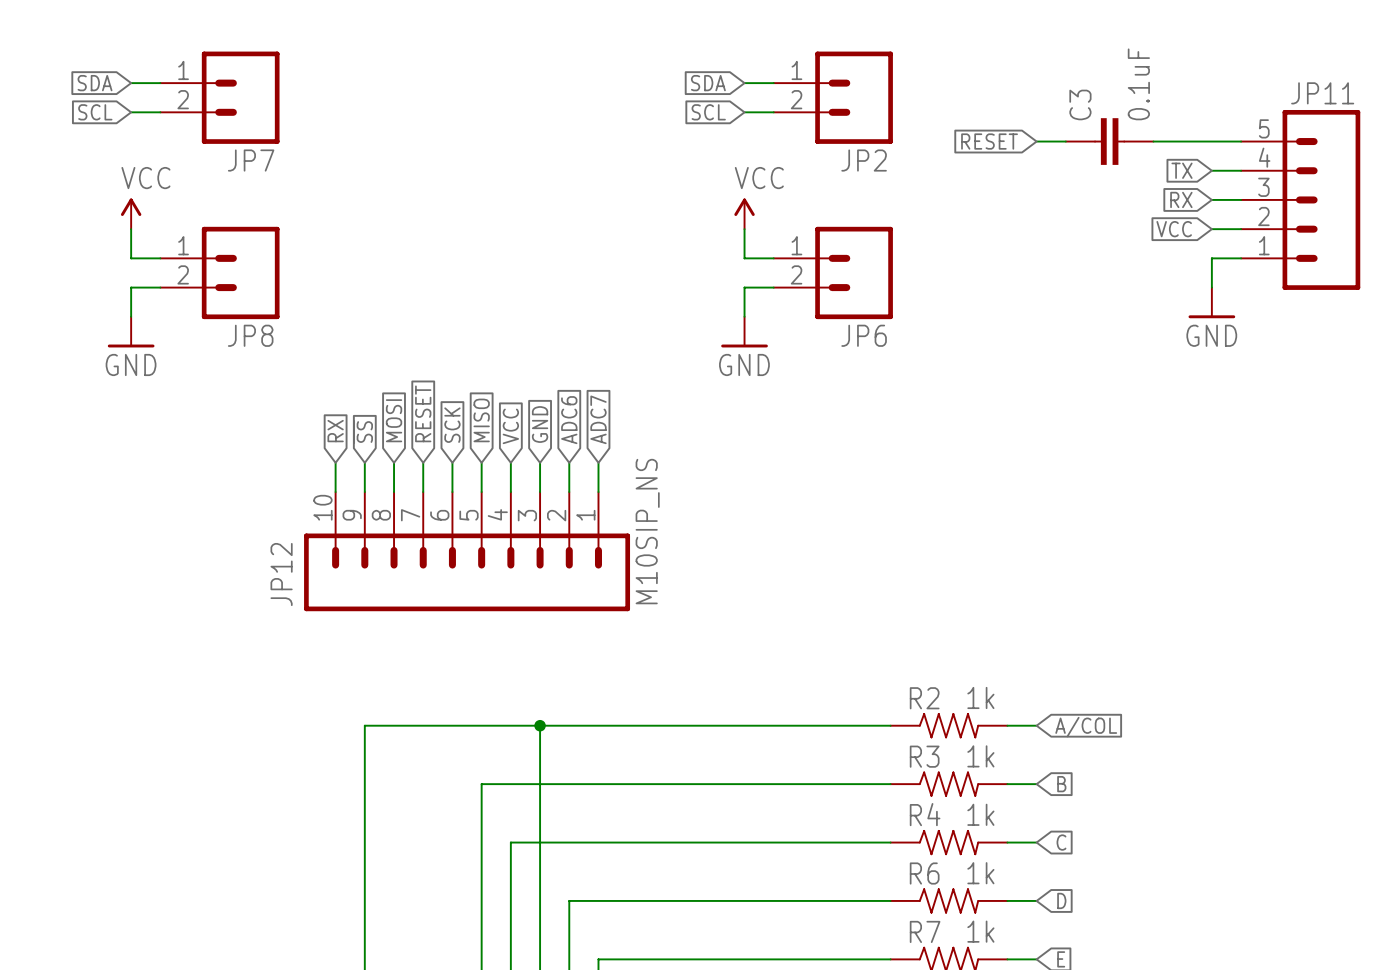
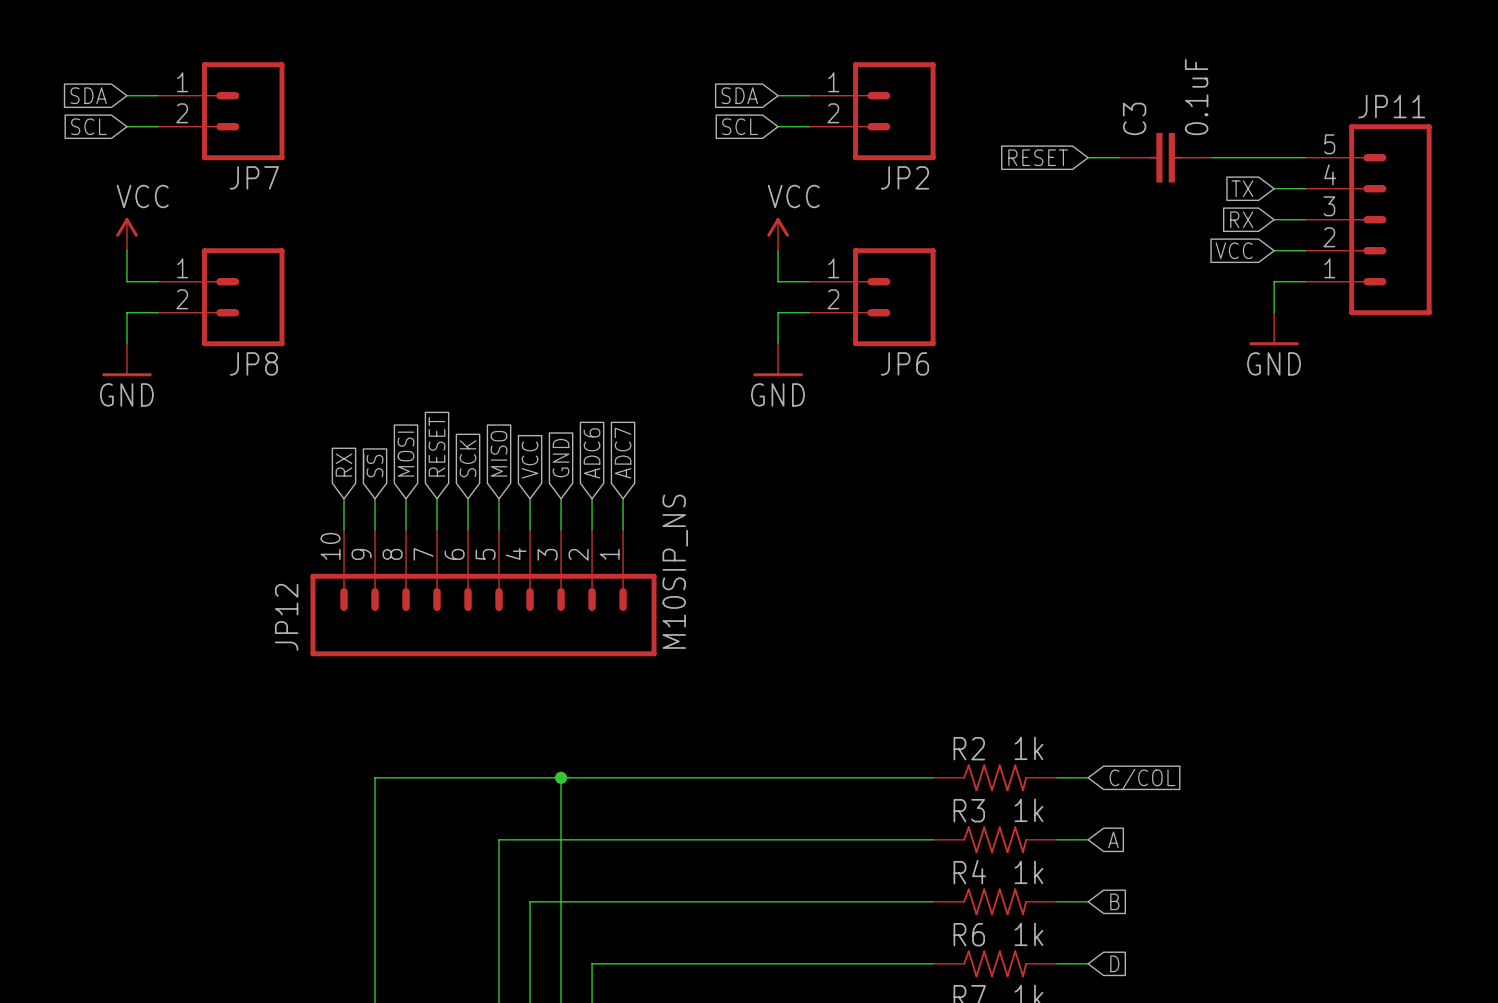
global label: A/COL (1086, 727) -> C/COL (1142, 779)
global label: B (1061, 784) -> A (1113, 839)
global label: C (1061, 842) -> B (1114, 901)

